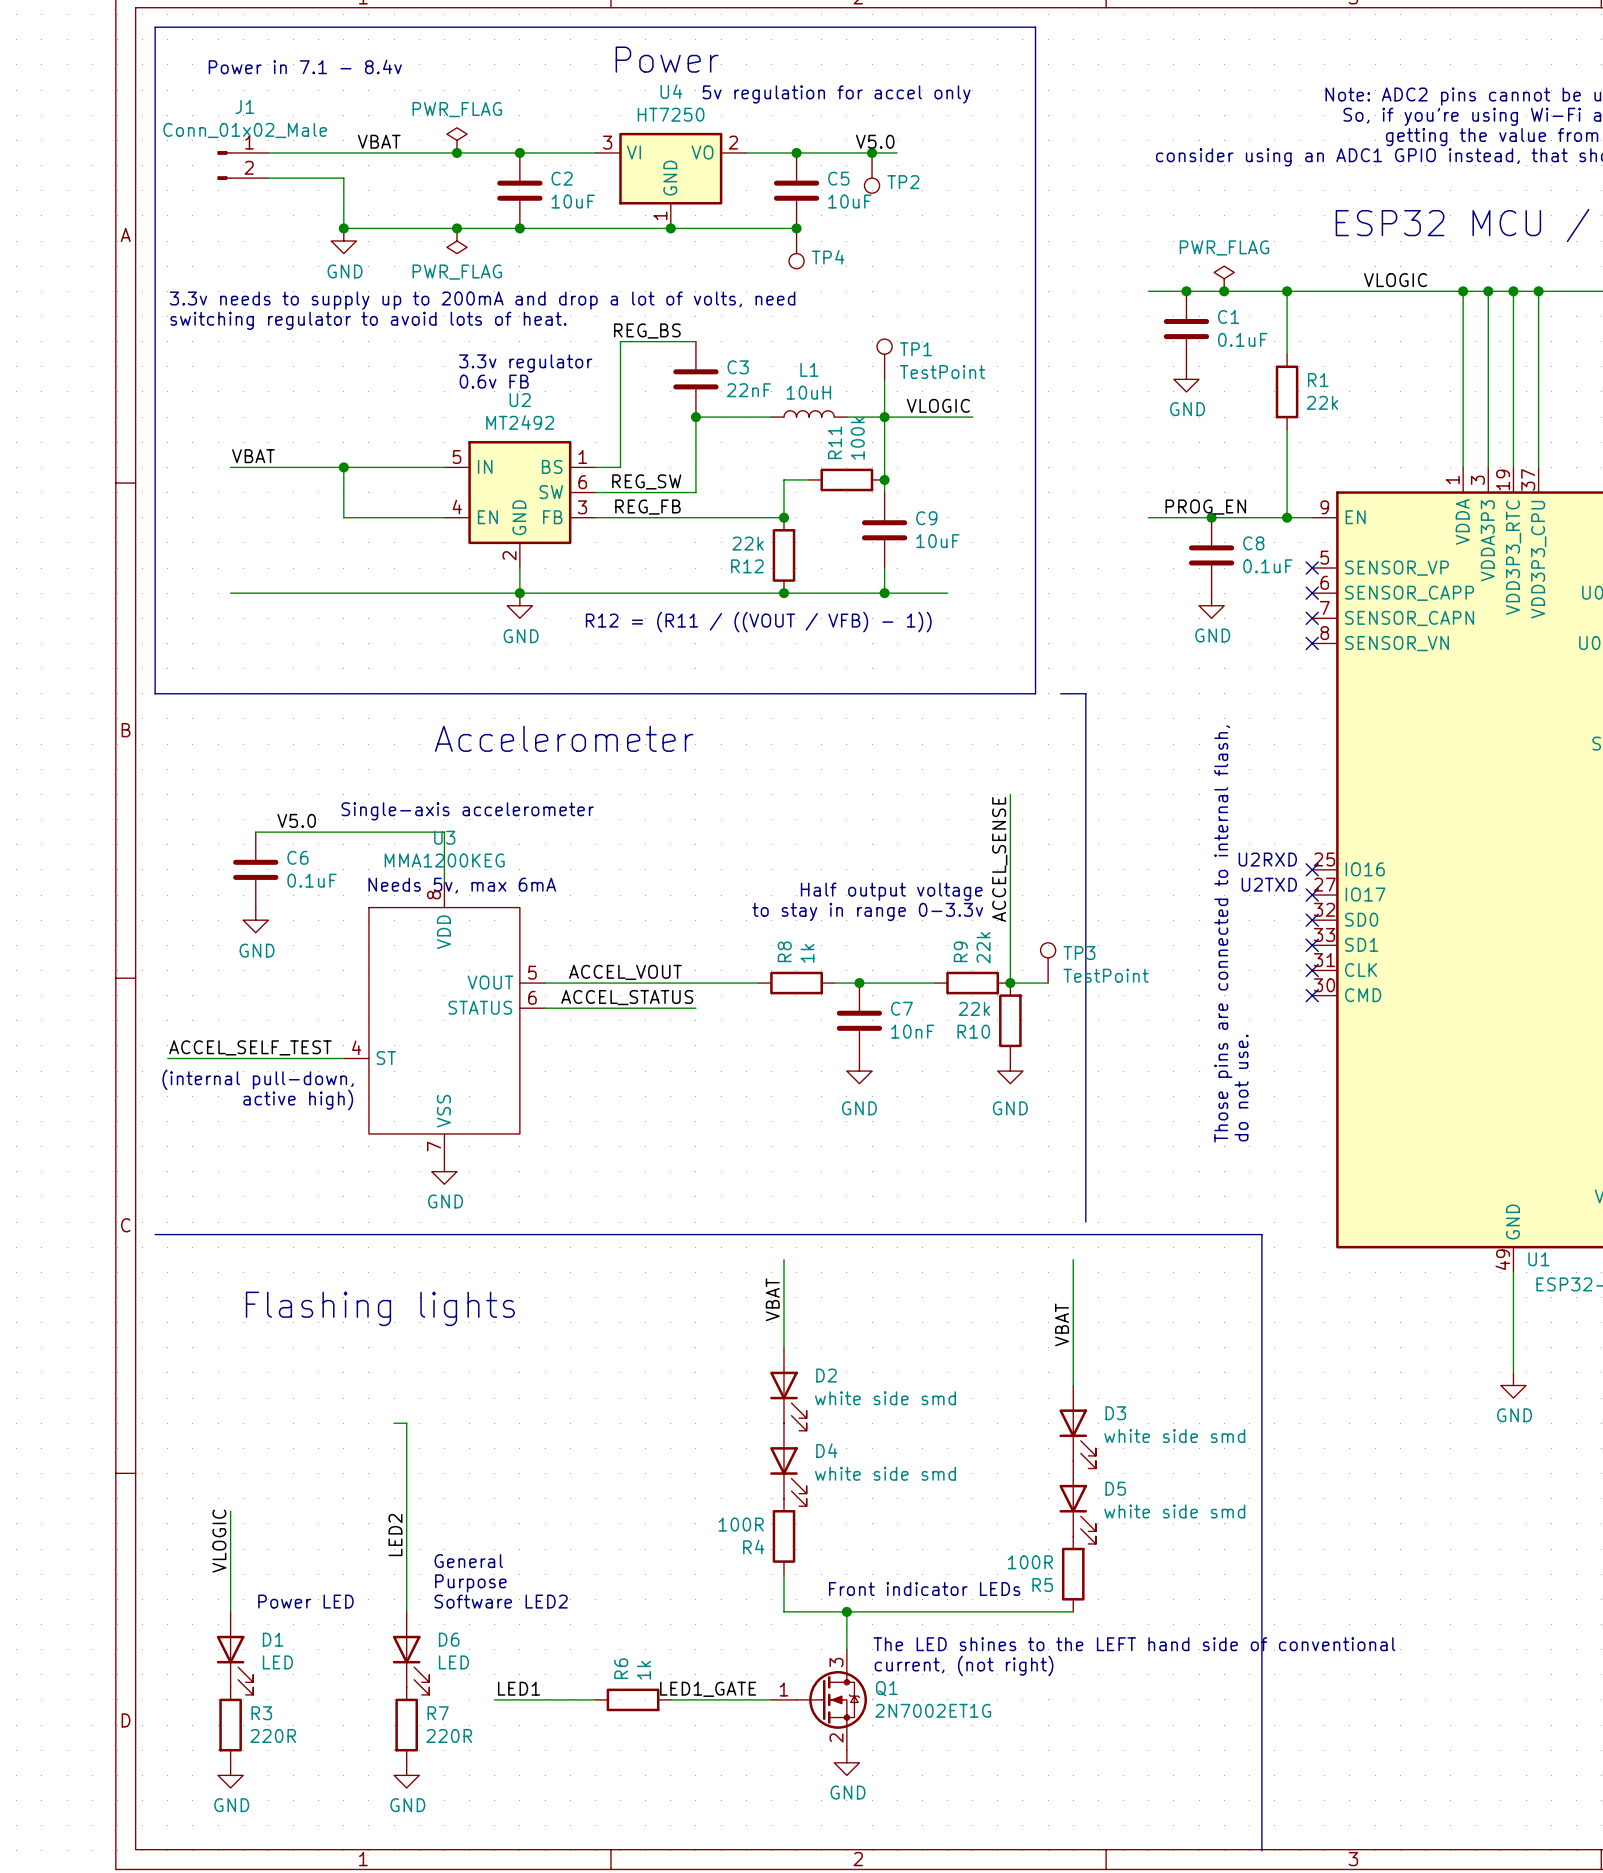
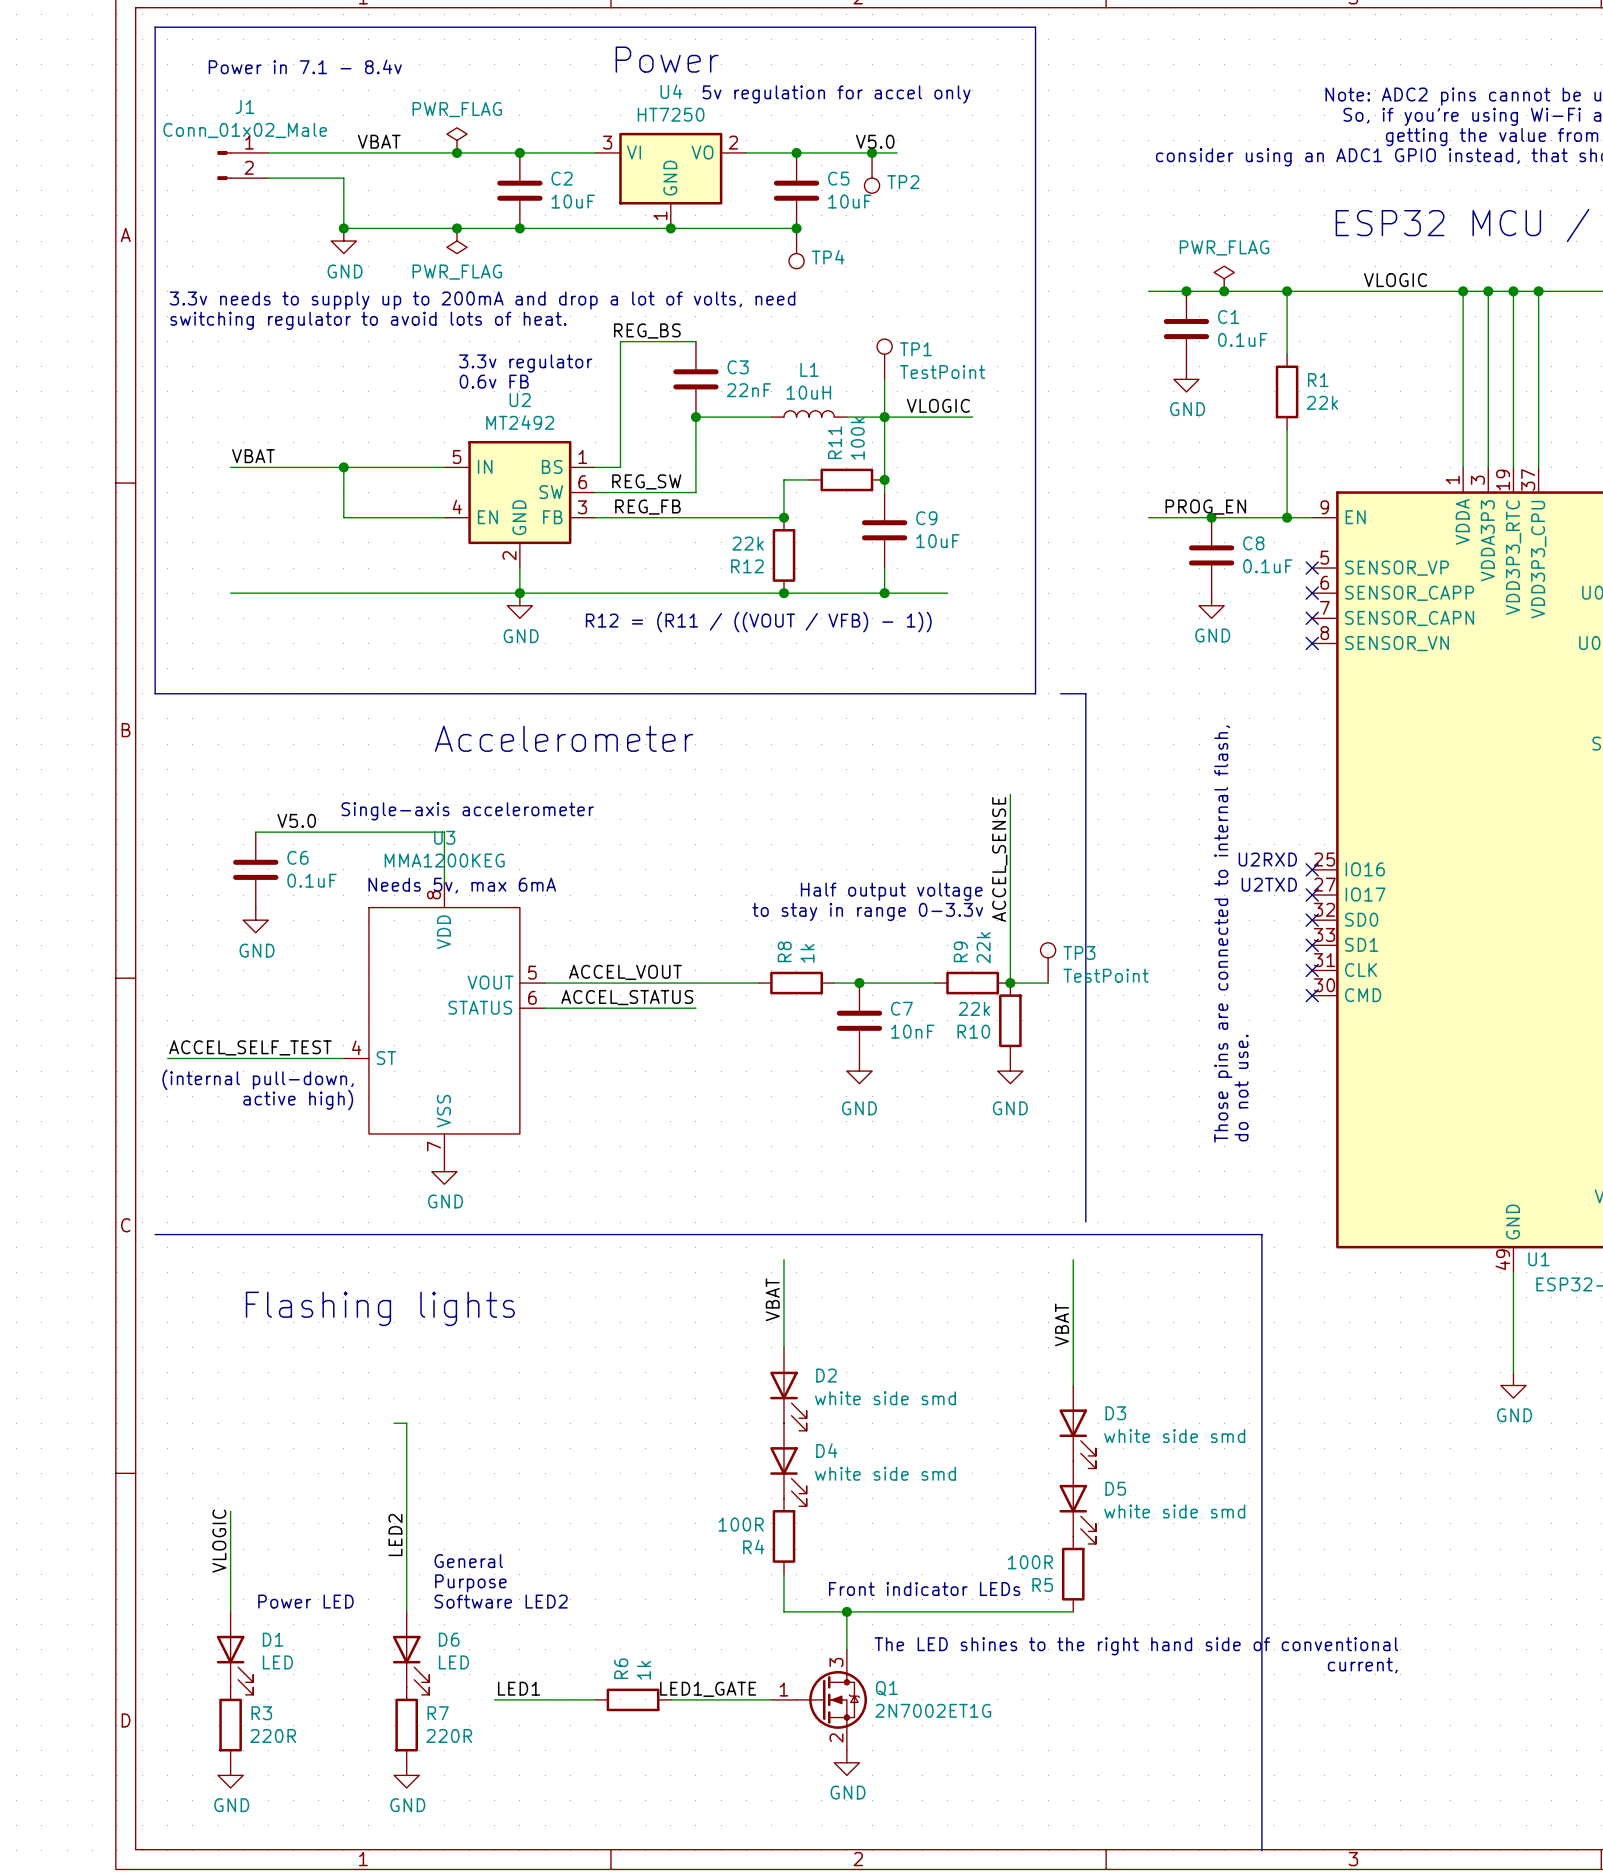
text: The LED shines to the LEFT hand side of conventional (1134, 1644) -> none
text: none -> The LED shines to the right hand side of conventional (1136, 1646)
text: current, (not right) (964, 1665) -> none
text: none -> current, (1362, 1665)

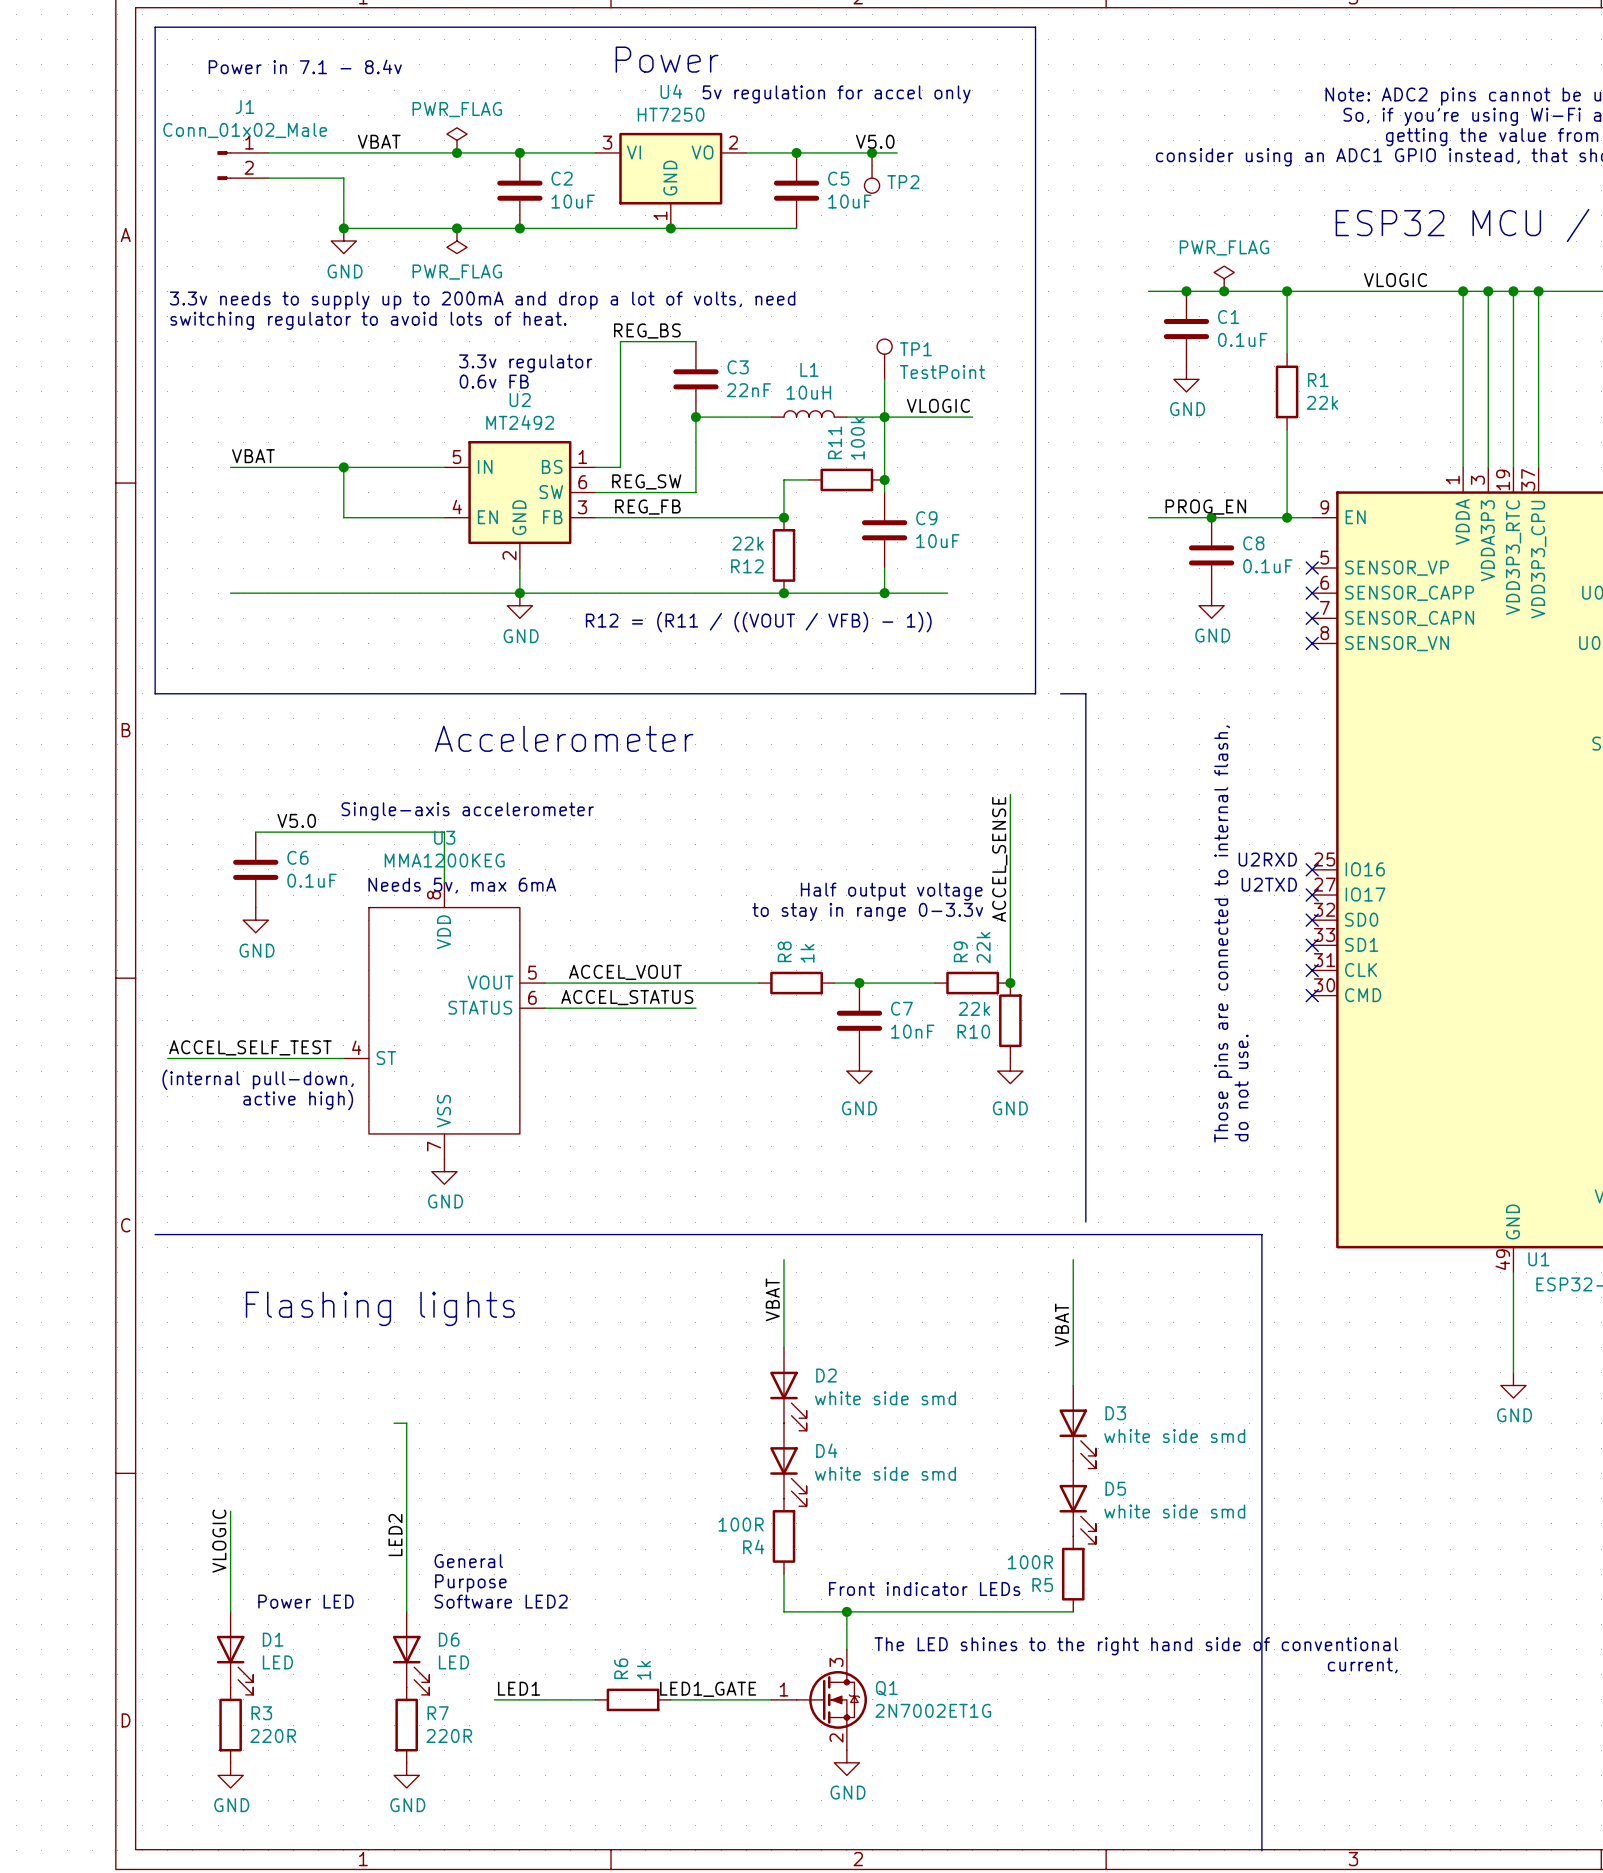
junction: (796, 228) -> none
TP4: (796, 248) -> none
TP3: TestPoint (1048, 962) -> none
wire: (1010, 983) (1048, 983) -> none

